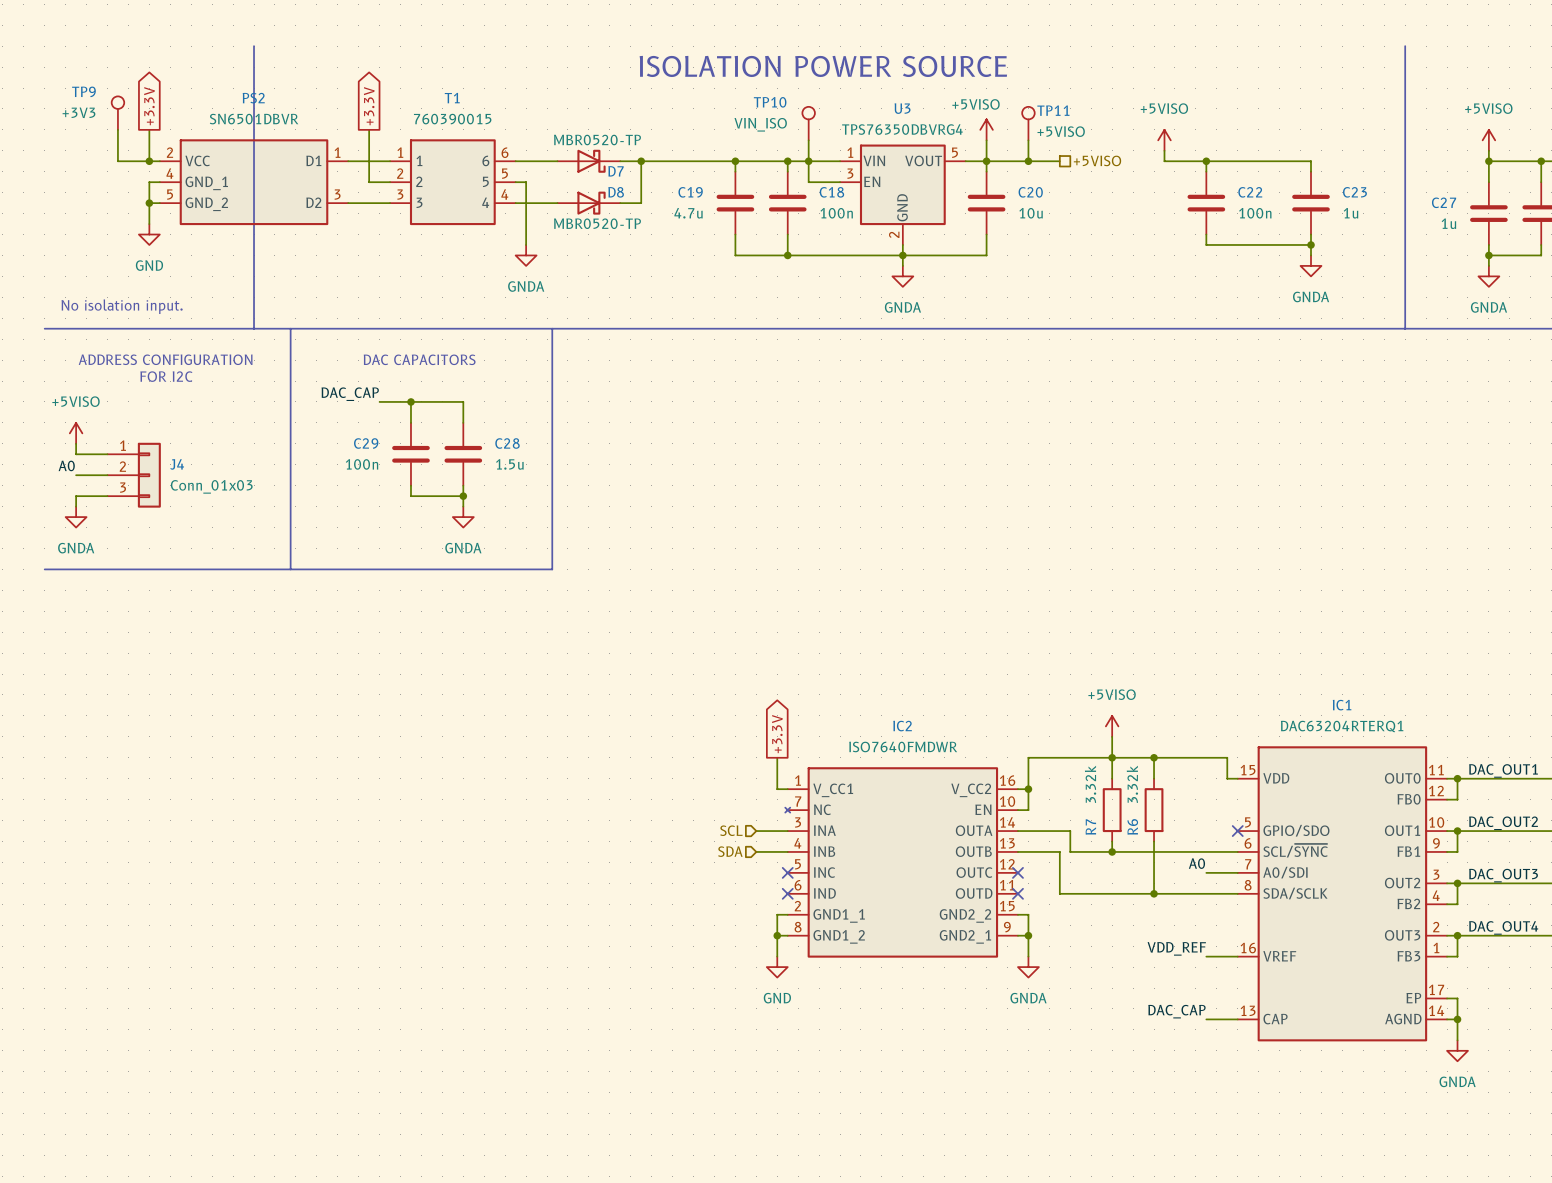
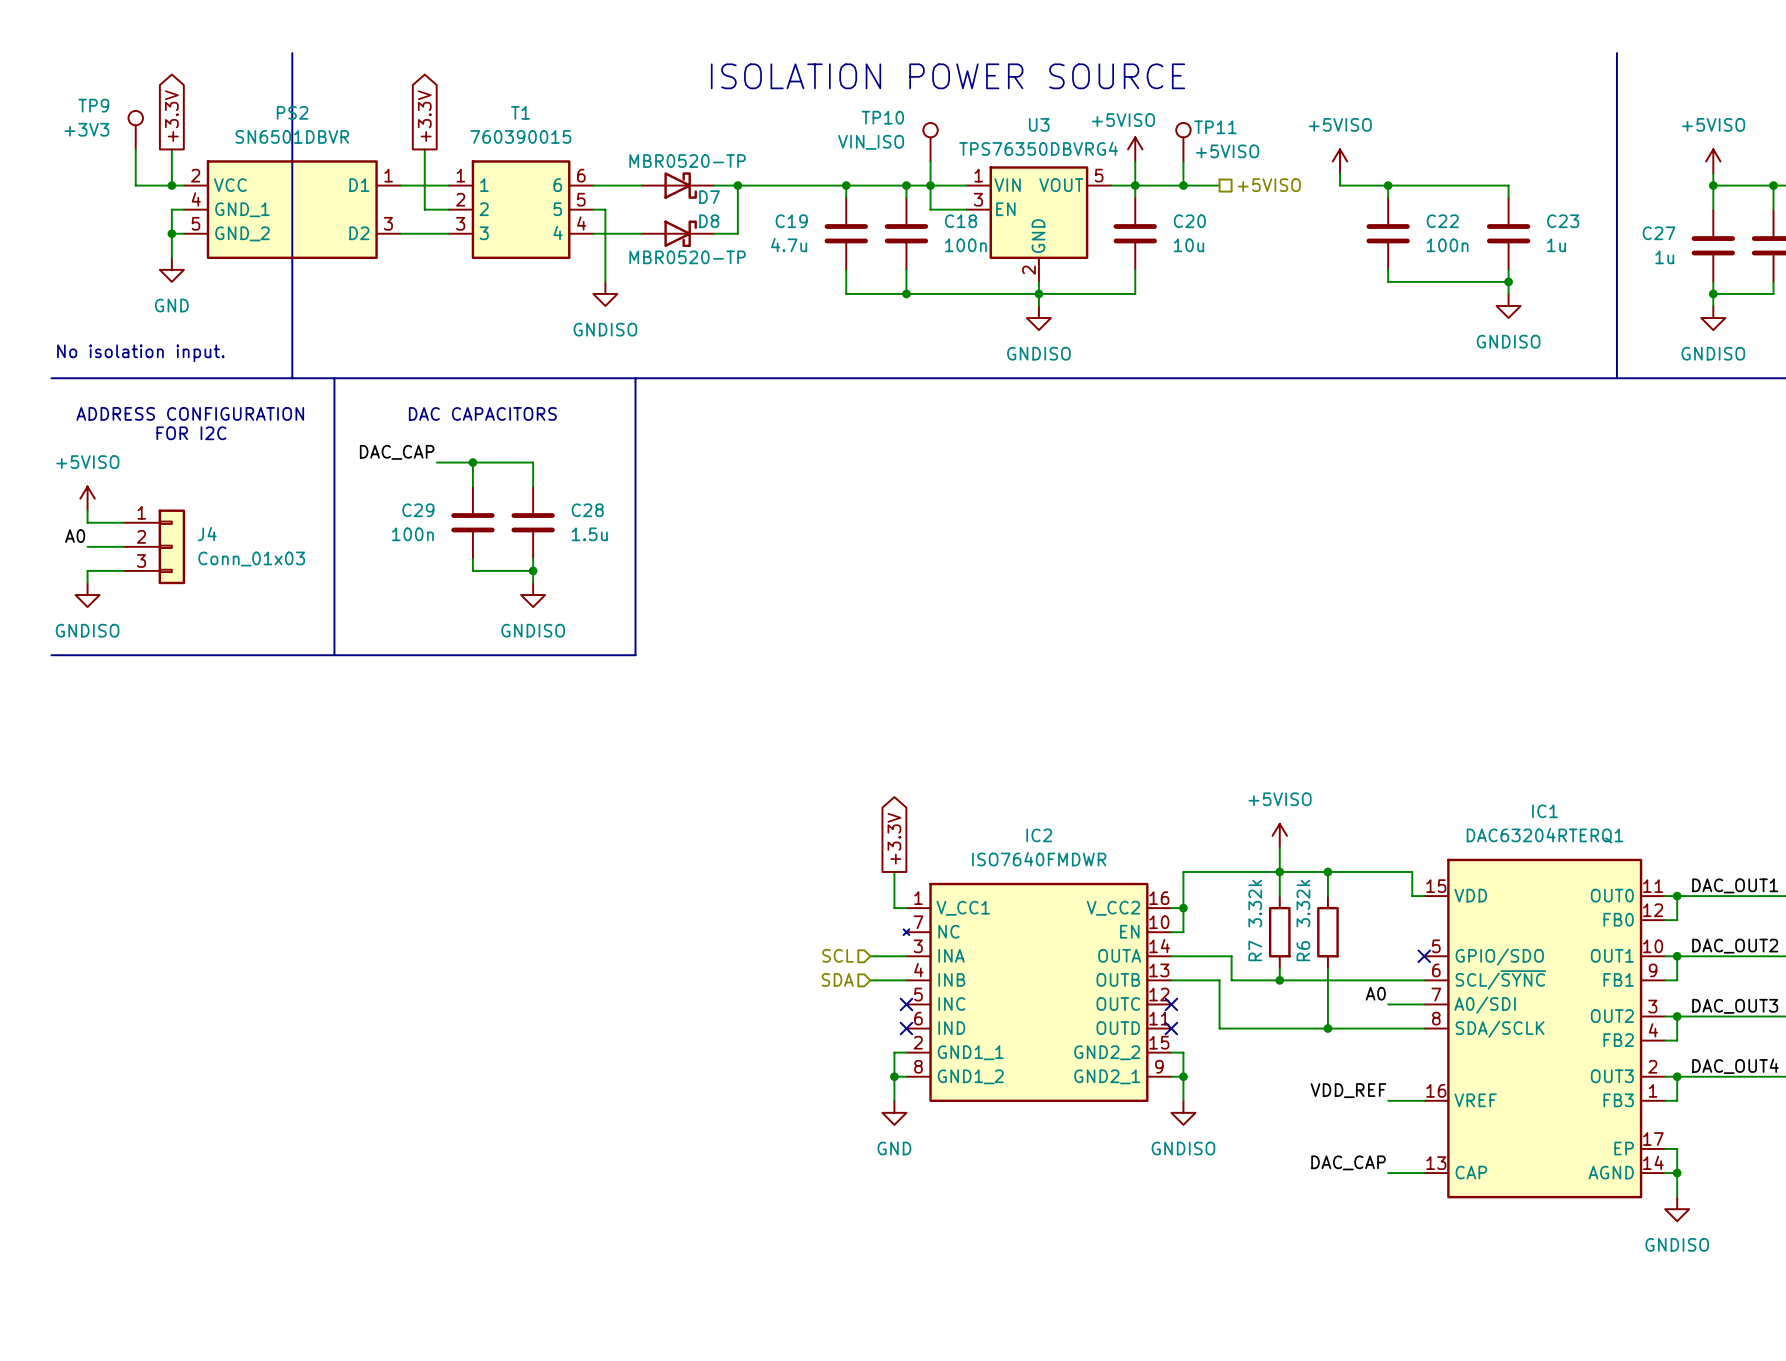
power symbol: GNDA (526, 255) -> GNDISO (605, 293)
power symbol: GNDA (1311, 265) -> GNDISO (1508, 305)
power symbol: GNDA (902, 276) -> GNDISO (1038, 318)
power symbol: GNDA (1488, 276) -> GNDISO (1713, 318)
power symbol: GNDA (76, 517) -> GNDISO (87, 595)
power symbol: GNDA (463, 517) -> GNDISO (533, 595)
power symbol: GNDA (1028, 967) -> GNDISO (1183, 1112)
power symbol: GNDA (1457, 1050) -> GNDISO (1677, 1209)

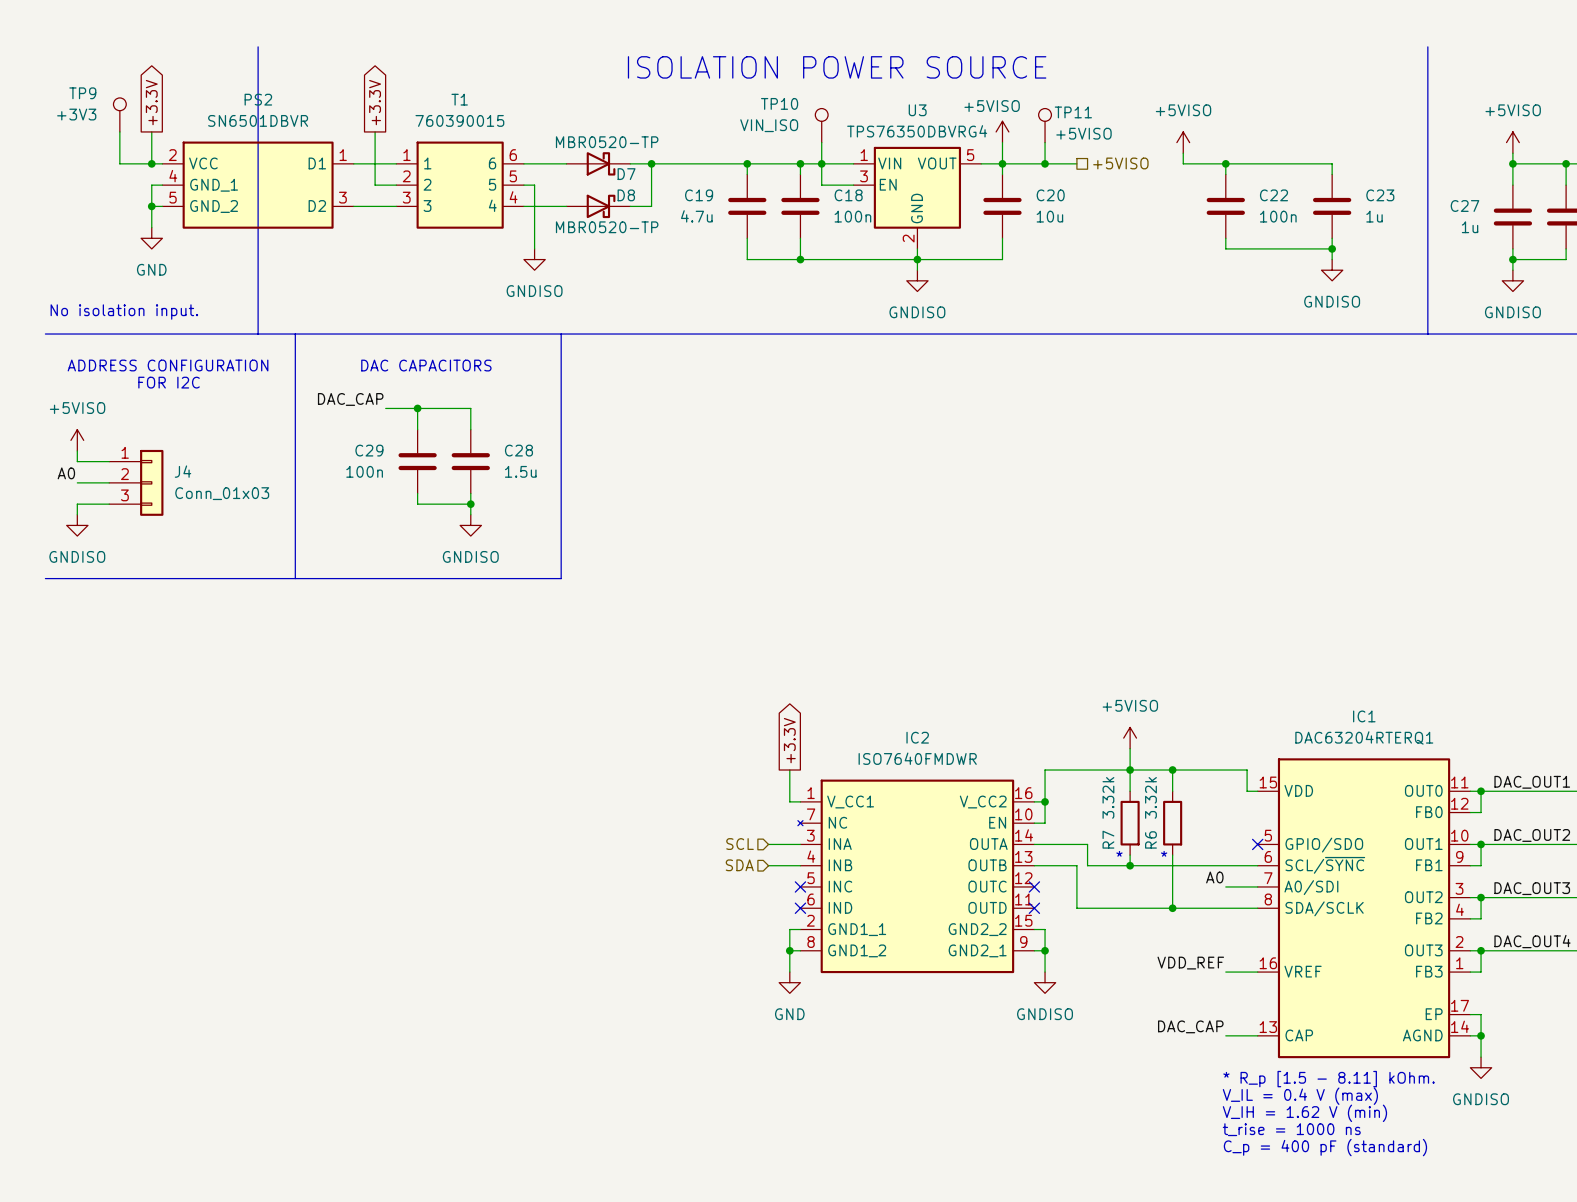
text: none -> * (1119, 853)
text: none -> * (1164, 853)
text: none -> * R_p [1.5 - 8.11] kOhm. (1328, 1079)
text: none -> V_IL = 0.4 V (max) (1300, 1096)
text: none -> V_IH = 1.62 V (min) (1304, 1113)
text: none -> t_rise = 1000 ns (1291, 1129)
text: none -> C_p = 400 pF (standard) (1325, 1147)

